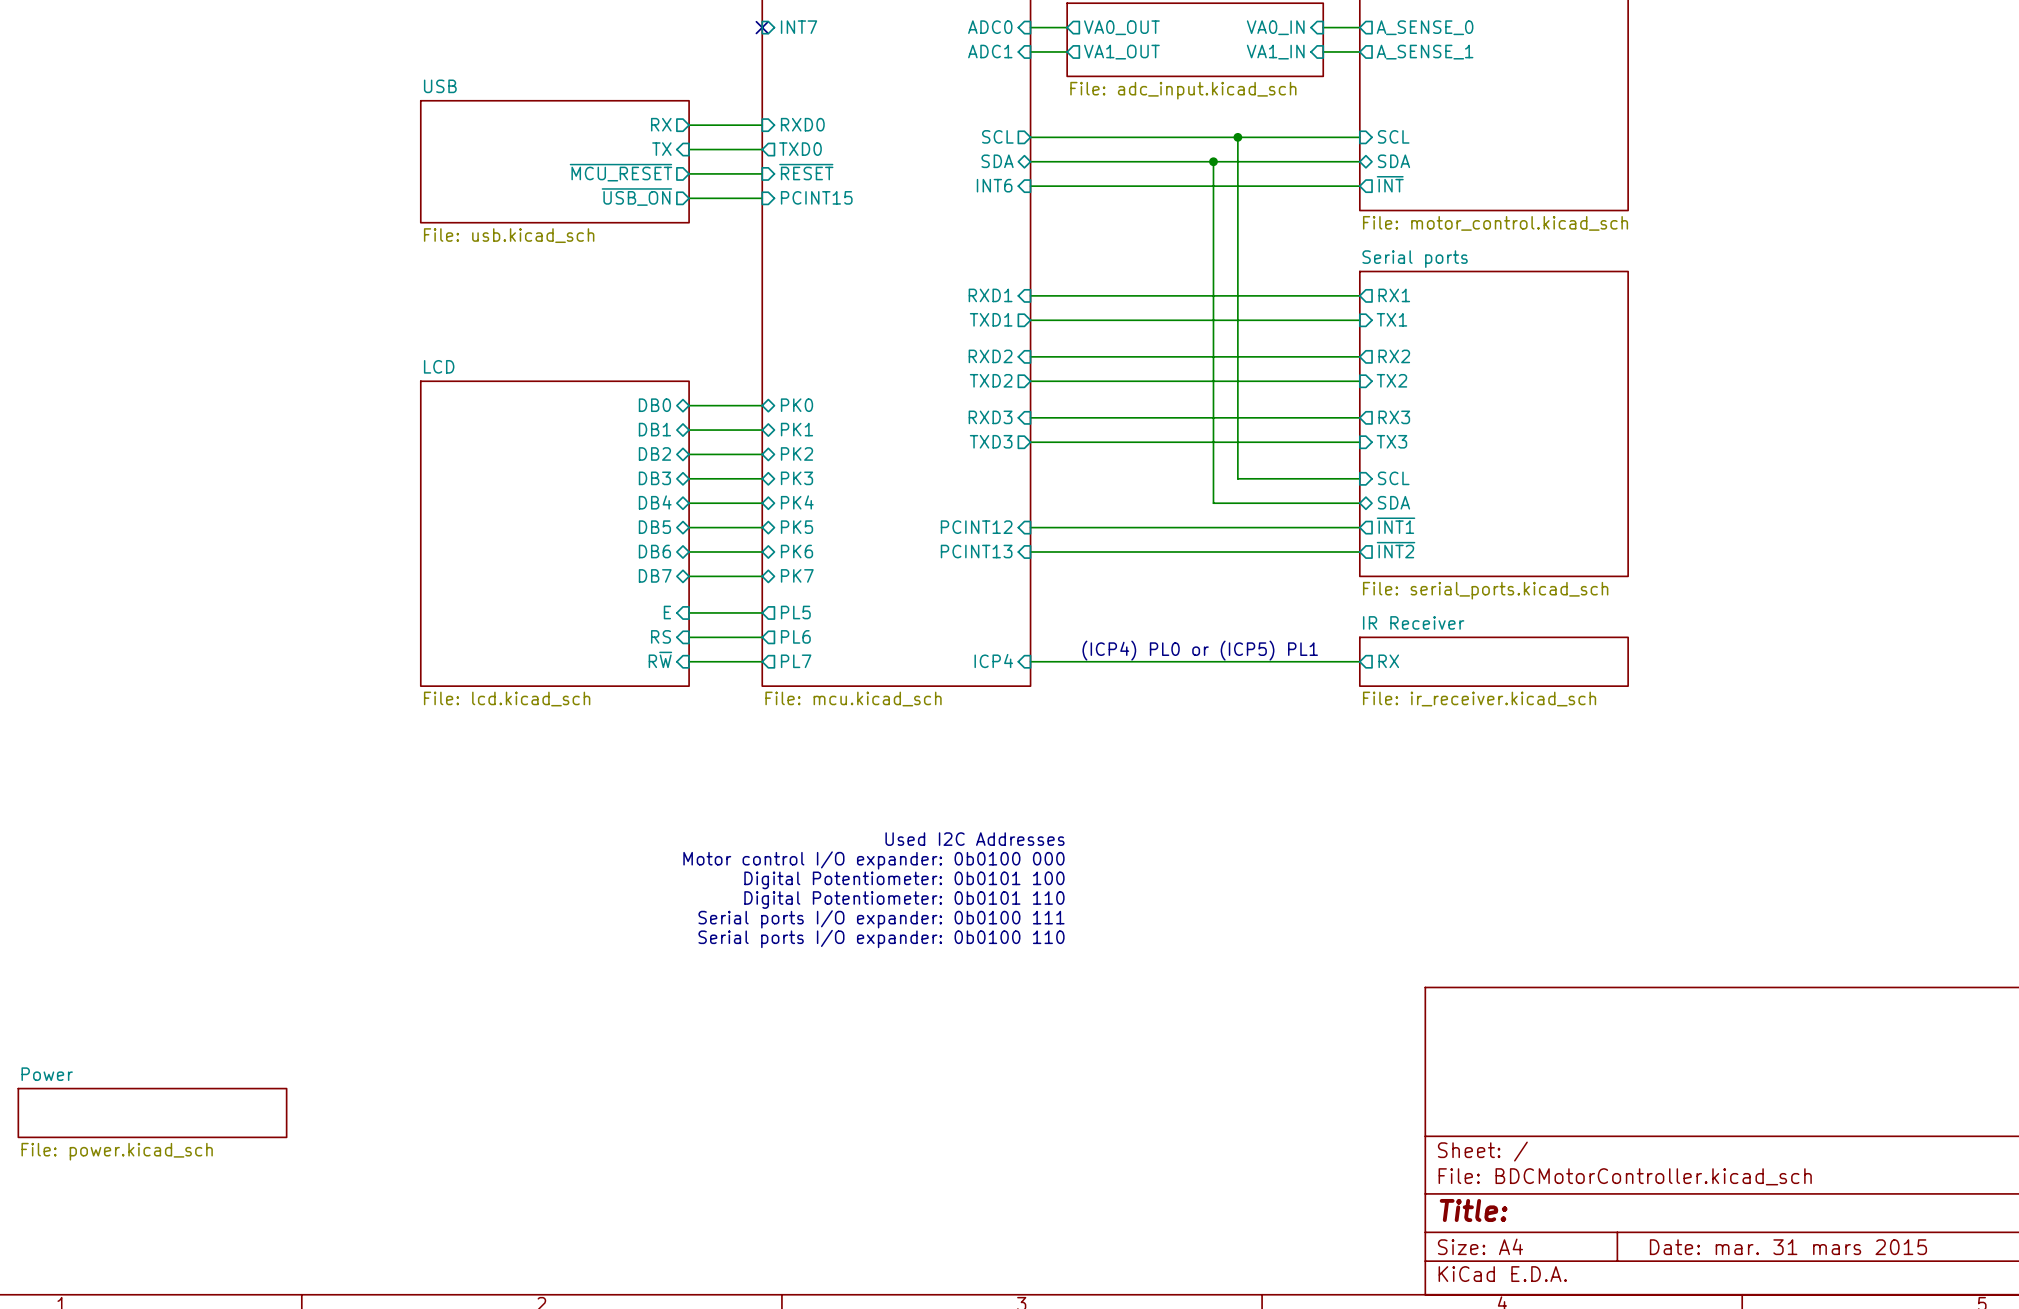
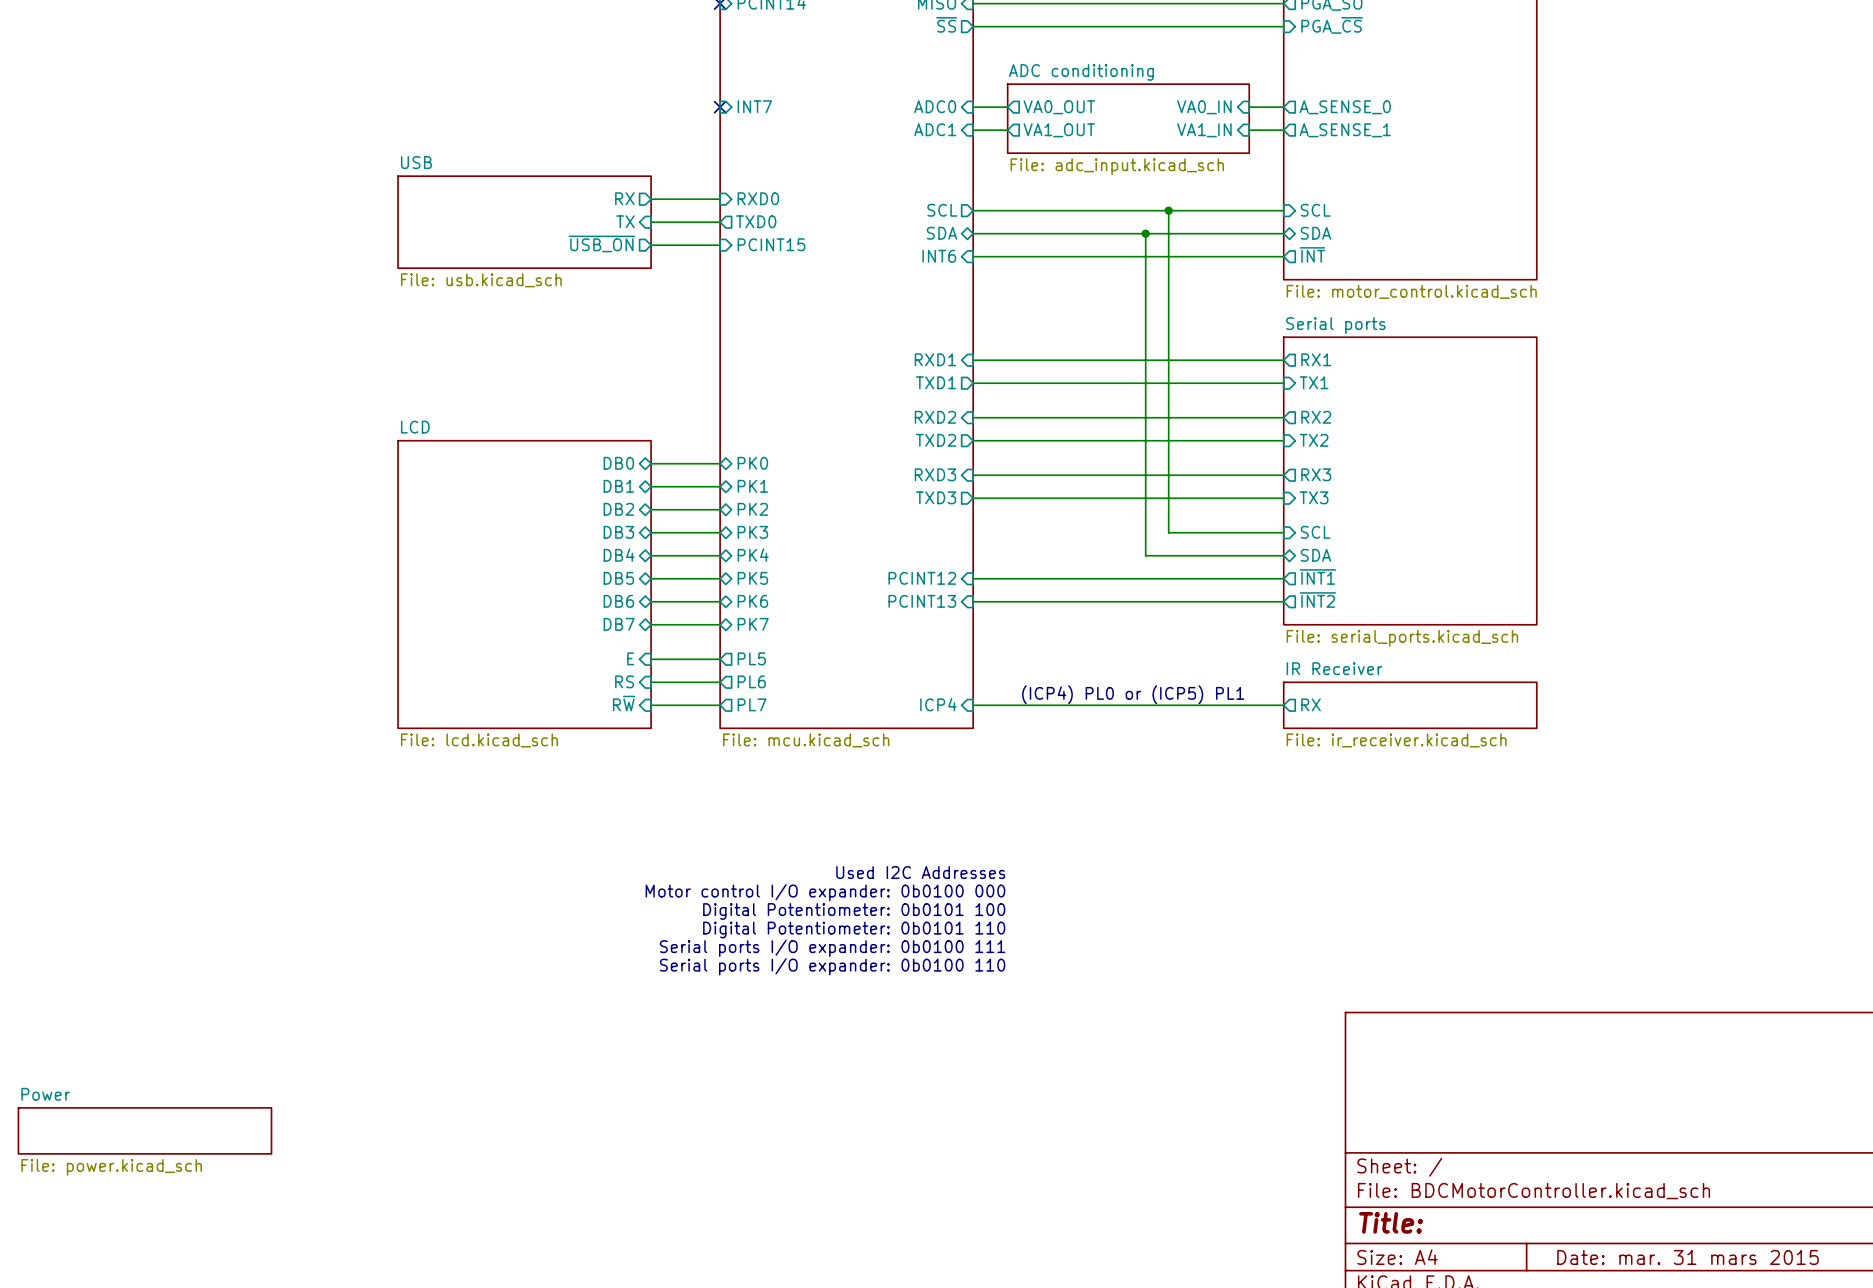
sheet USB: none -> File: usb.kicad_sch (524, 222)
sheet USB: File: usb.kicad_sch (554, 161) -> none
sheet pin: ~{MCU_RESET} (620, 172) -> ~{USB_ON} (601, 243)
sheet pin: ~{RESET} (806, 172) -> PCINT15 (771, 244)
sheet pin: ~{USB_ON} (636, 197) -> none
sheet pin: PCINT15 (816, 197) -> none
wire: (689, 198) (762, 198) -> none

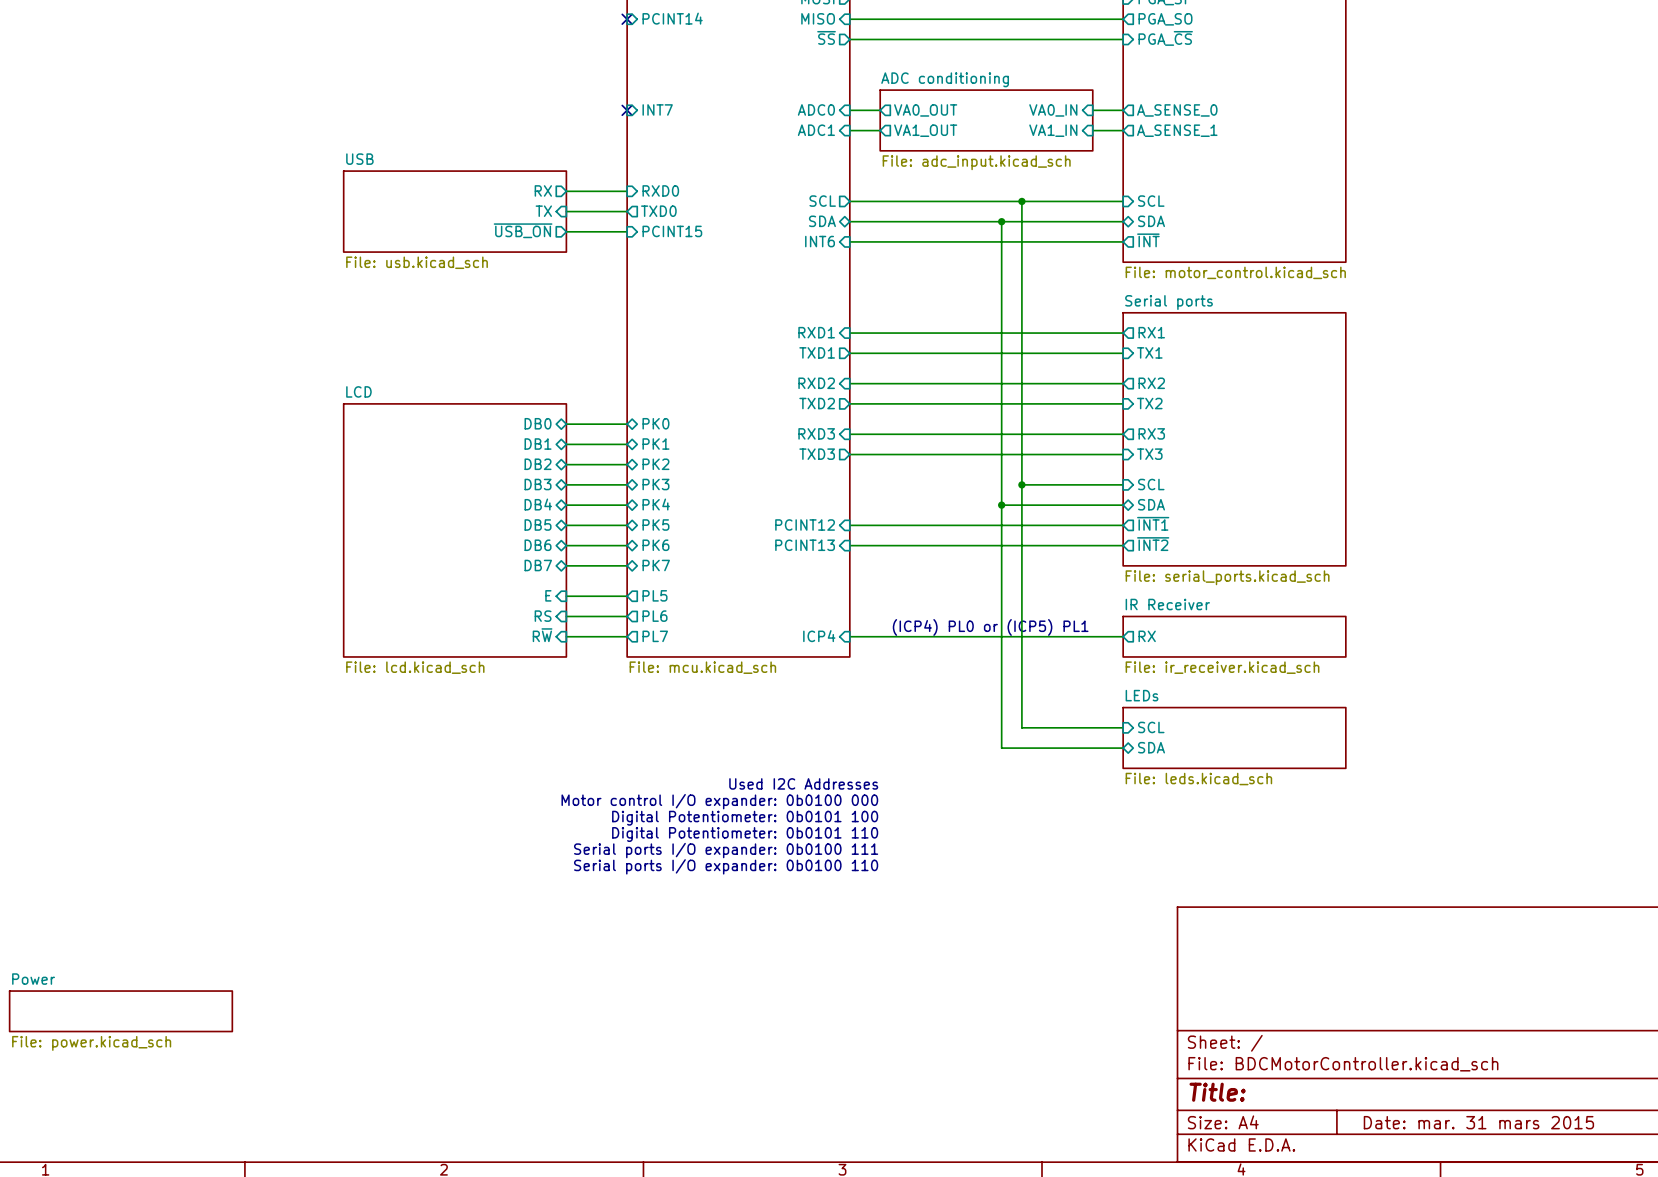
wire: none -> (1021, 484) (1021, 727) (1123, 727)
junction: none -> (1021, 484)
wire: none -> (1001, 505) (1001, 748) (1123, 748)
junction: none -> (1001, 505)
sheet pin: none -> SCL (1151, 727)
sheet LEDs: none -> File: leds.kicad_sch (1234, 737)
sheet pin: none -> SDA (1151, 747)

